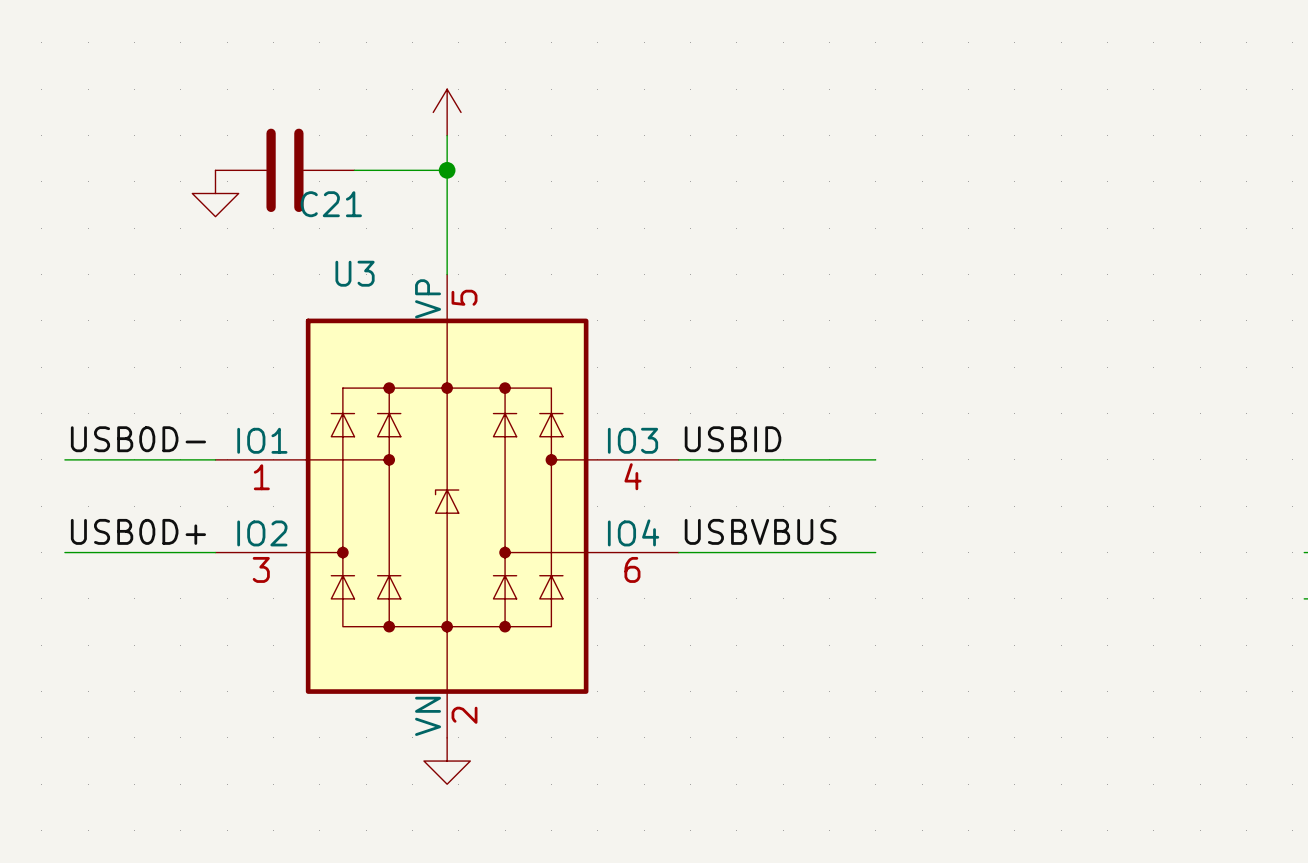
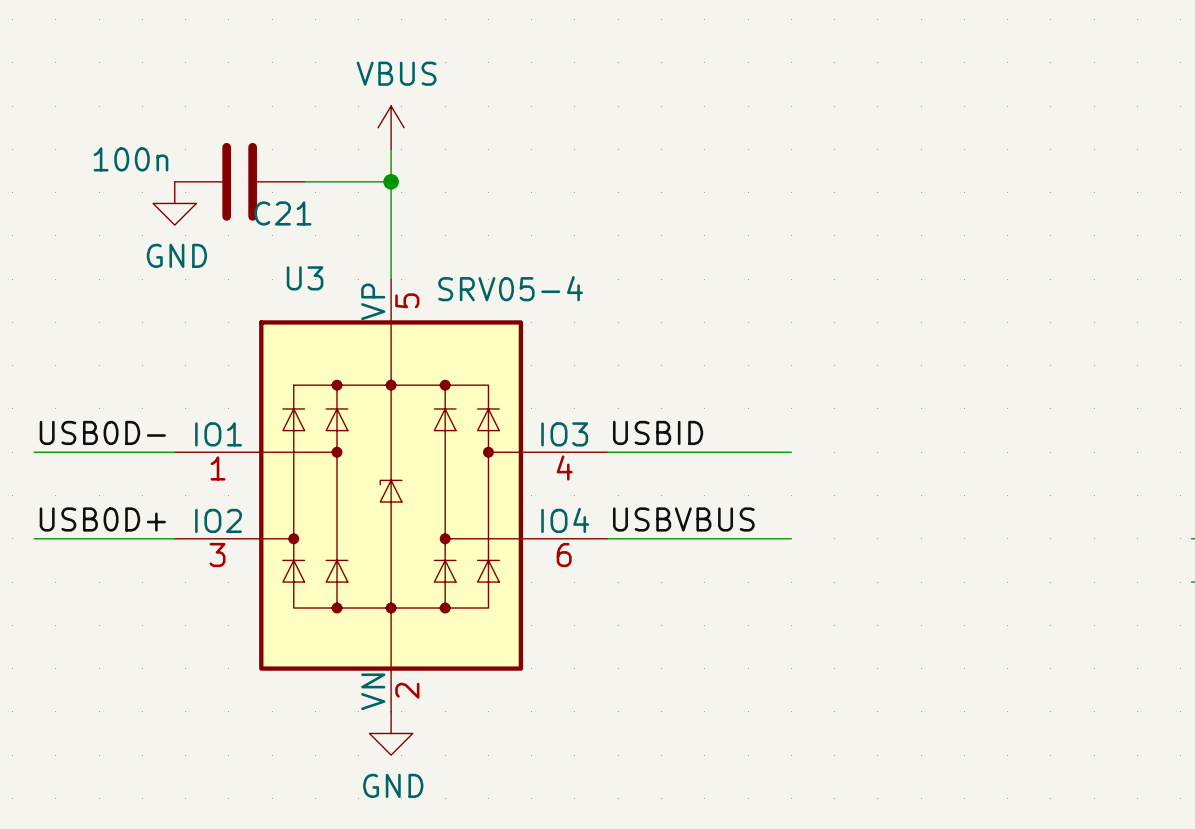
power symbol text: none -> VBUS (396, 73)
C21 value: none -> 100n (130, 159)
power symbol text: none -> GND (176, 255)
U3 value: none -> SRV05-4 (510, 288)
power symbol text: none -> GND (393, 785)

